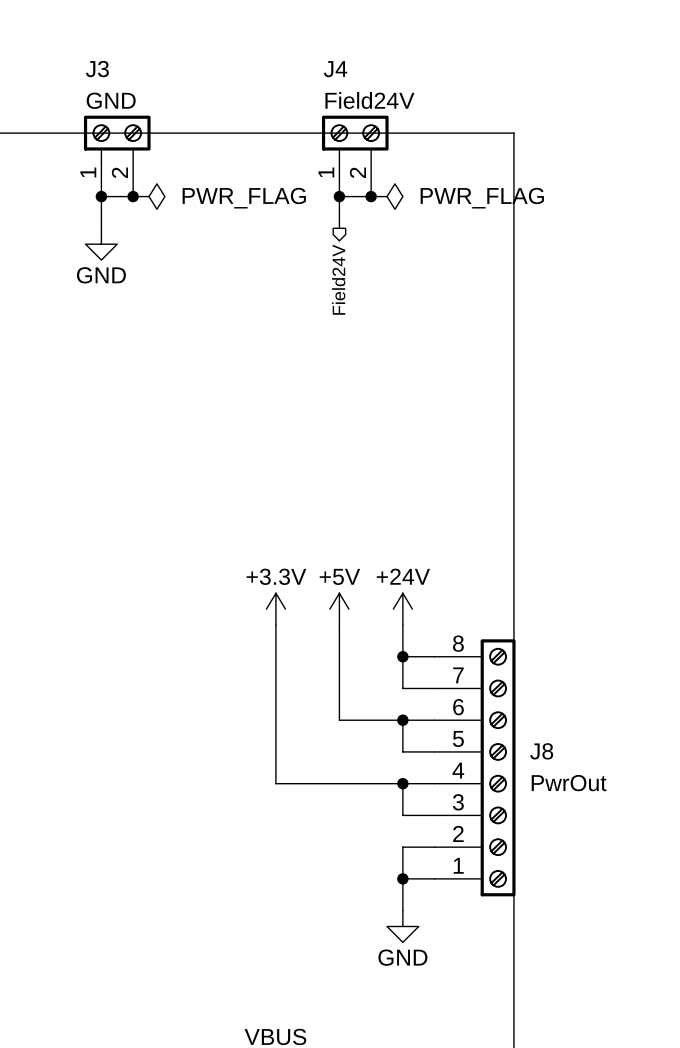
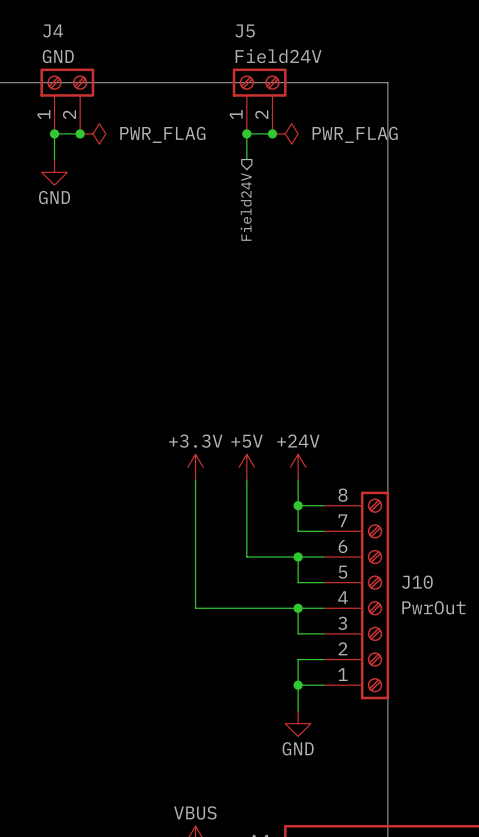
J3 name: J3 (97, 69) -> J4 (53, 30)
J4 name: J4 (335, 69) -> J5 (245, 30)
J8 name: J8 (541, 751) -> J10 (417, 582)

